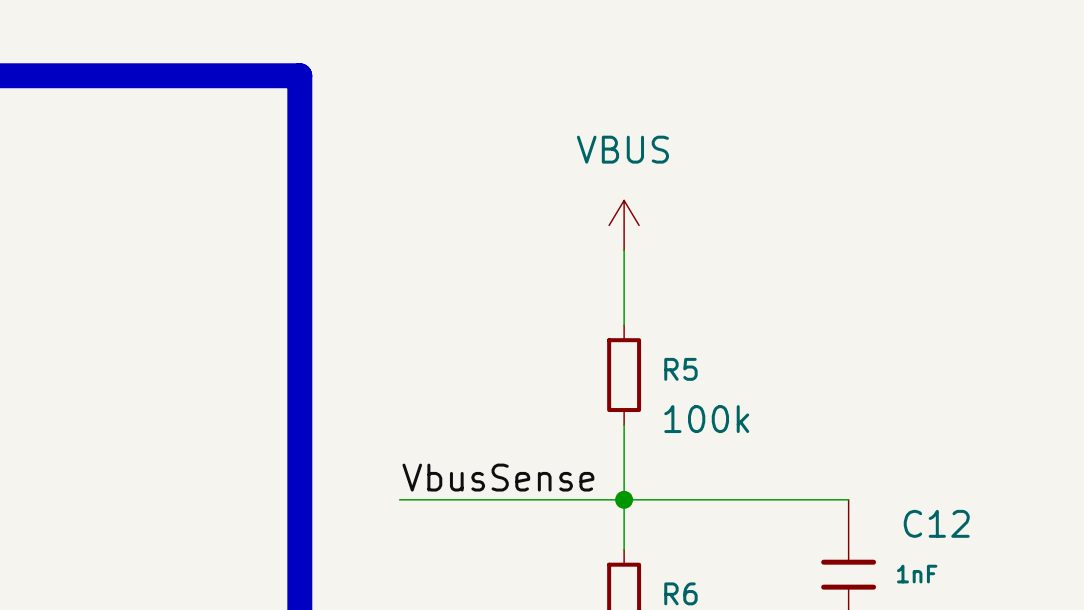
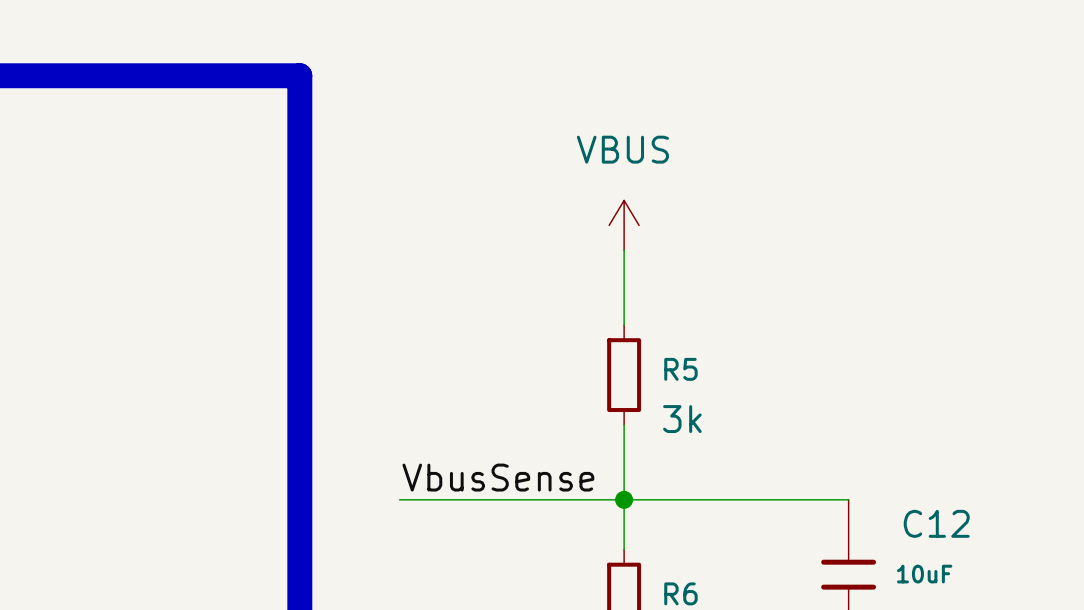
R5 value: 100k (706, 419) -> 3k (682, 419)
C12 value: 1nF (917, 574) -> 10uF (924, 574)

